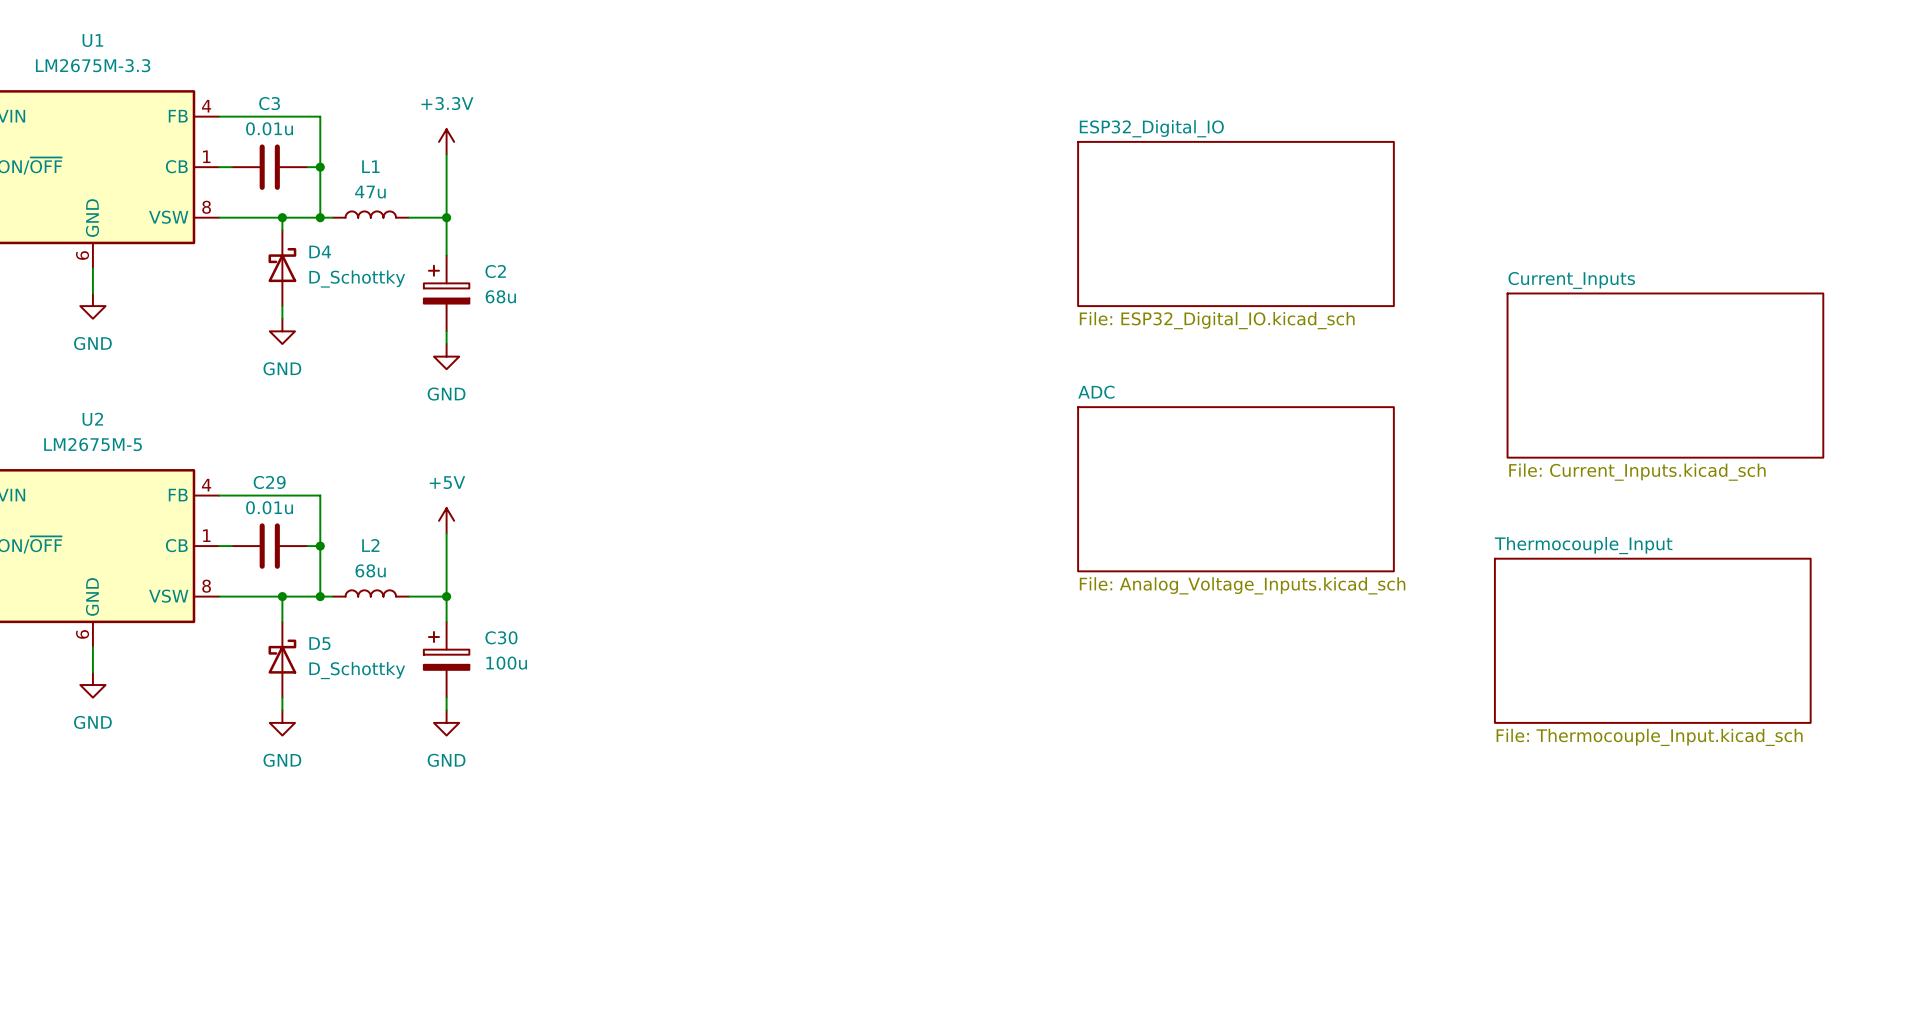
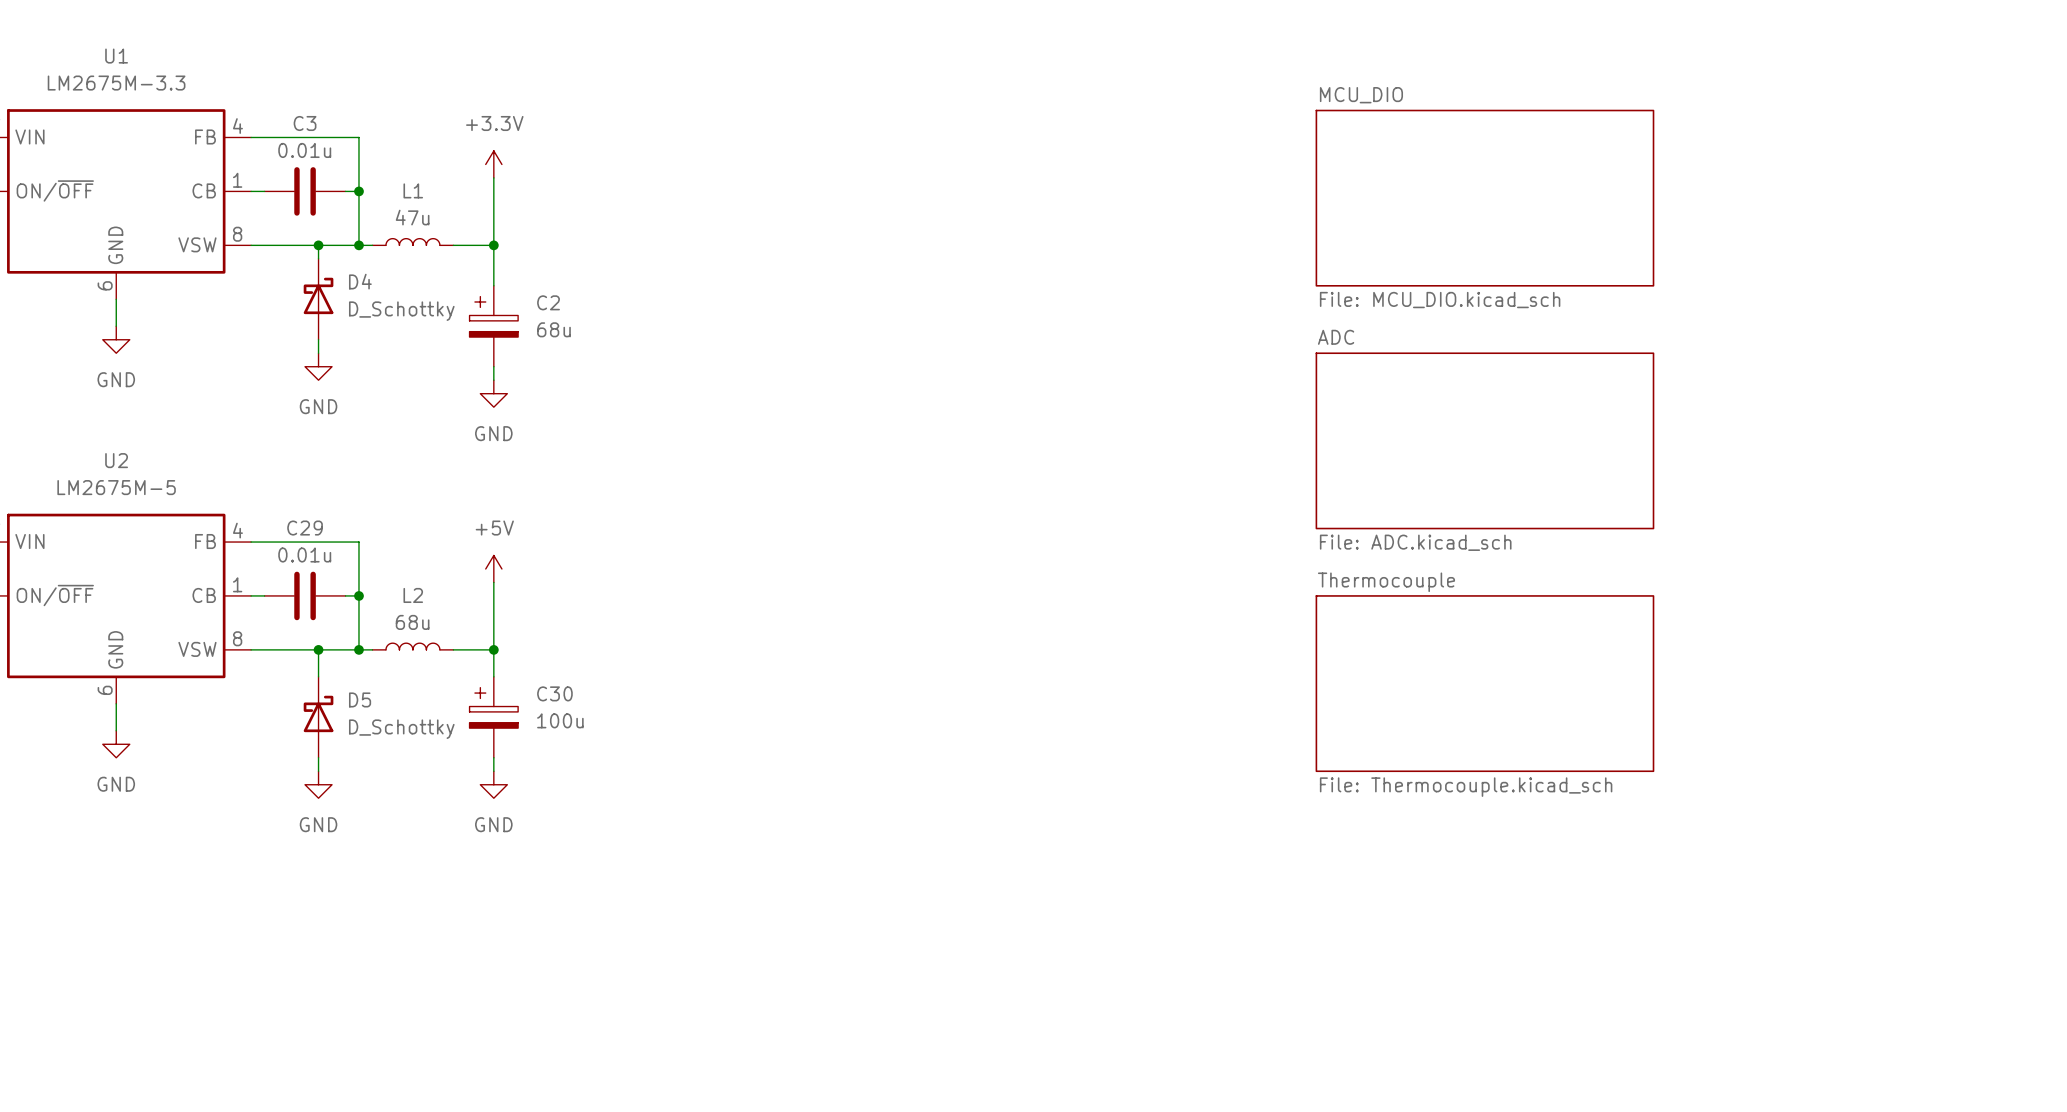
sheet MCU_DIO: none -> File: MCU_DIO.kicad_sch (1484, 198)
sheet ESP32_Digital_IO: File: ESP32_Digital_IO.kicad_sch (1235, 224) -> none
sheet Current_Inputs: File: Current_Inputs.kicad_sch (1665, 375) -> none
sheet ADC: none -> File: ADC.kicad_sch (1484, 440)
sheet ADC: File: Analog_Voltage_Inputs.kicad_sch (1235, 489) -> none
sheet Thermocouple: none -> File: Thermocouple.kicad_sch (1484, 683)
sheet Thermocouple_Input: File: Thermocouple_Input.kicad_sch (1652, 640) -> none

